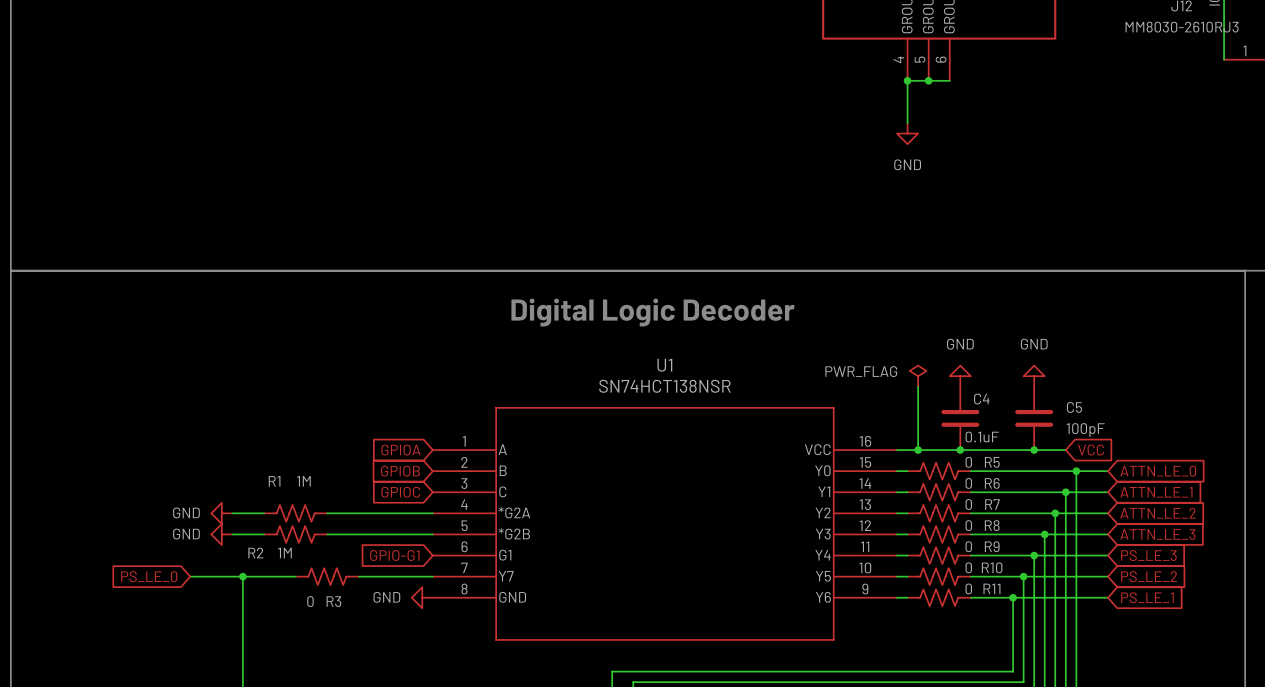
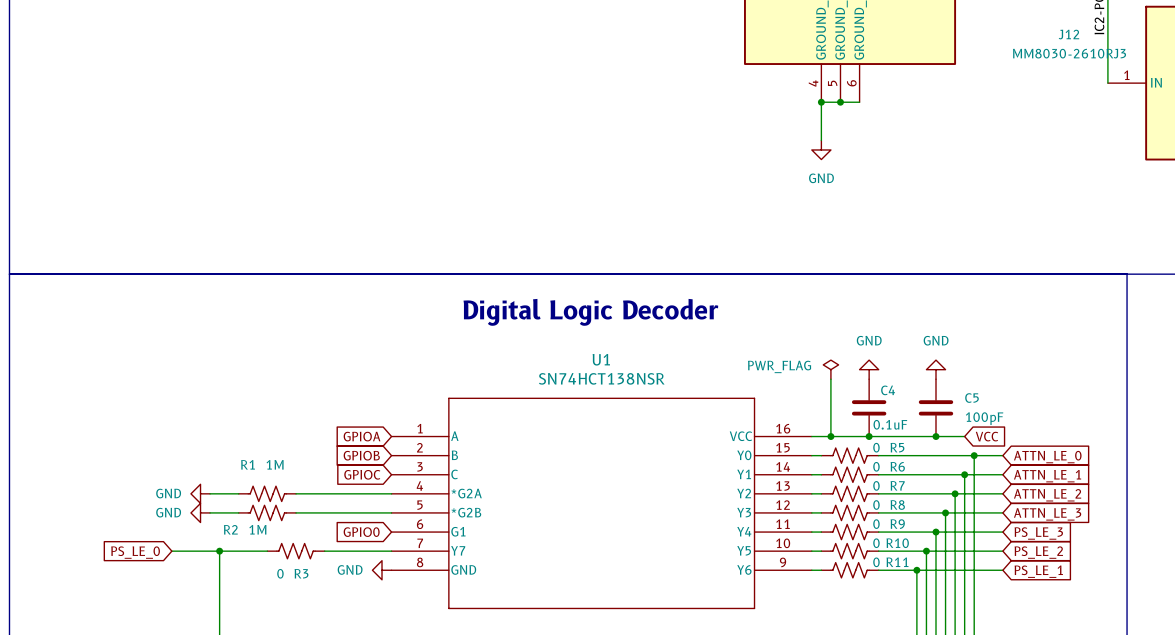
global label: GPIO-G1 (394, 555) -> GPIO0 (361, 532)

